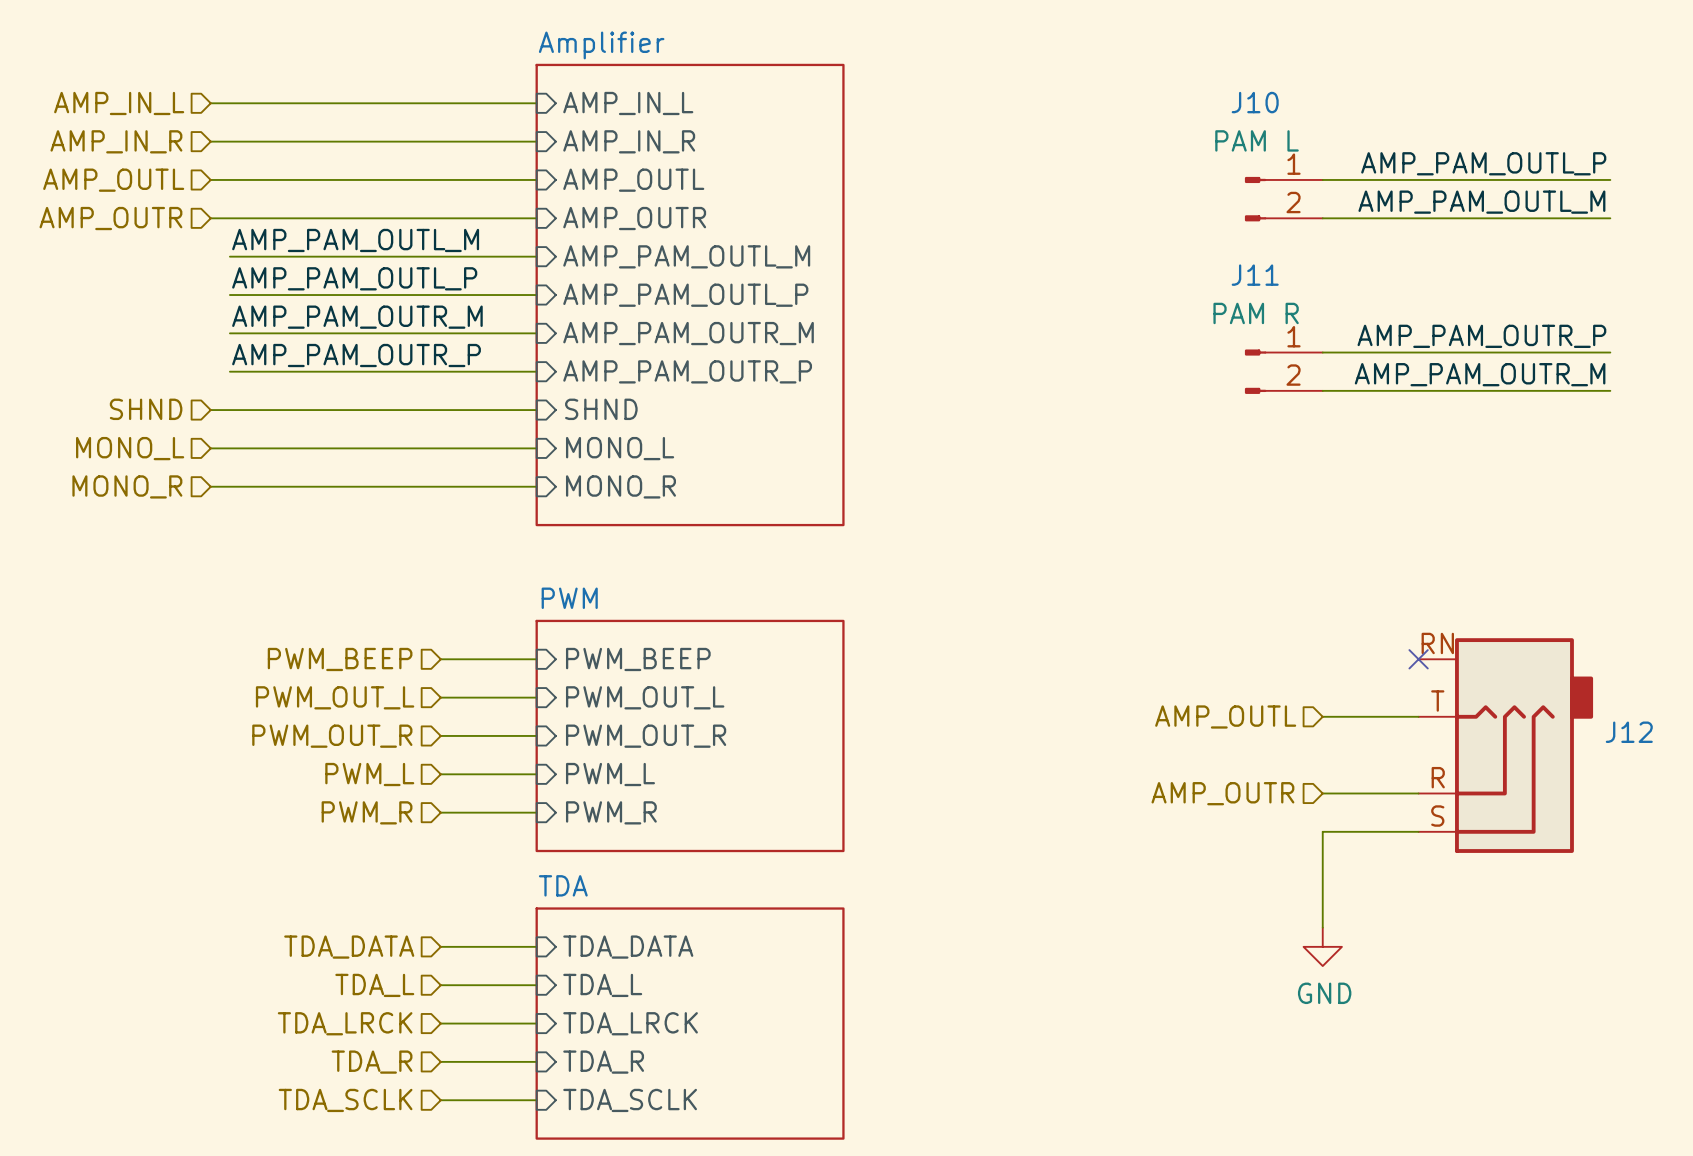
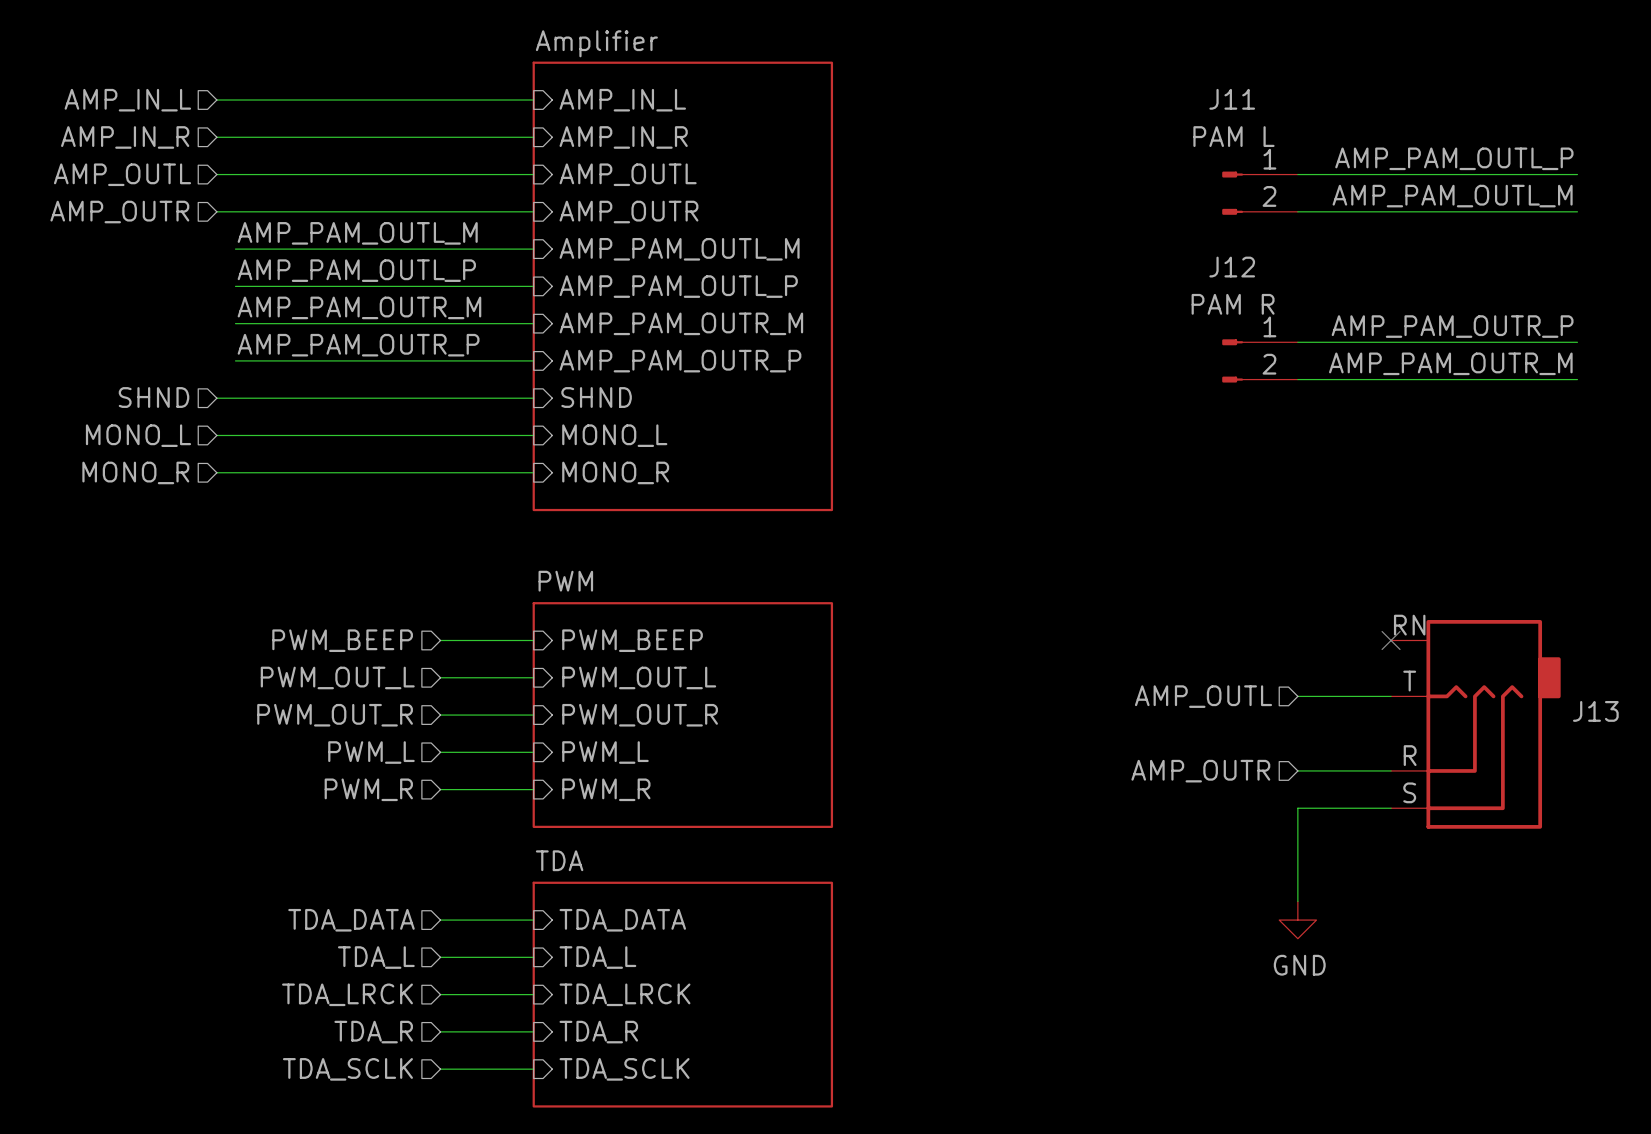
J10 name: J10 (1255, 102) -> J11 (1232, 99)
J11 name: J11 (1255, 275) -> J12 (1232, 267)
J12 name: J12 (1629, 732) -> J13 (1595, 711)

